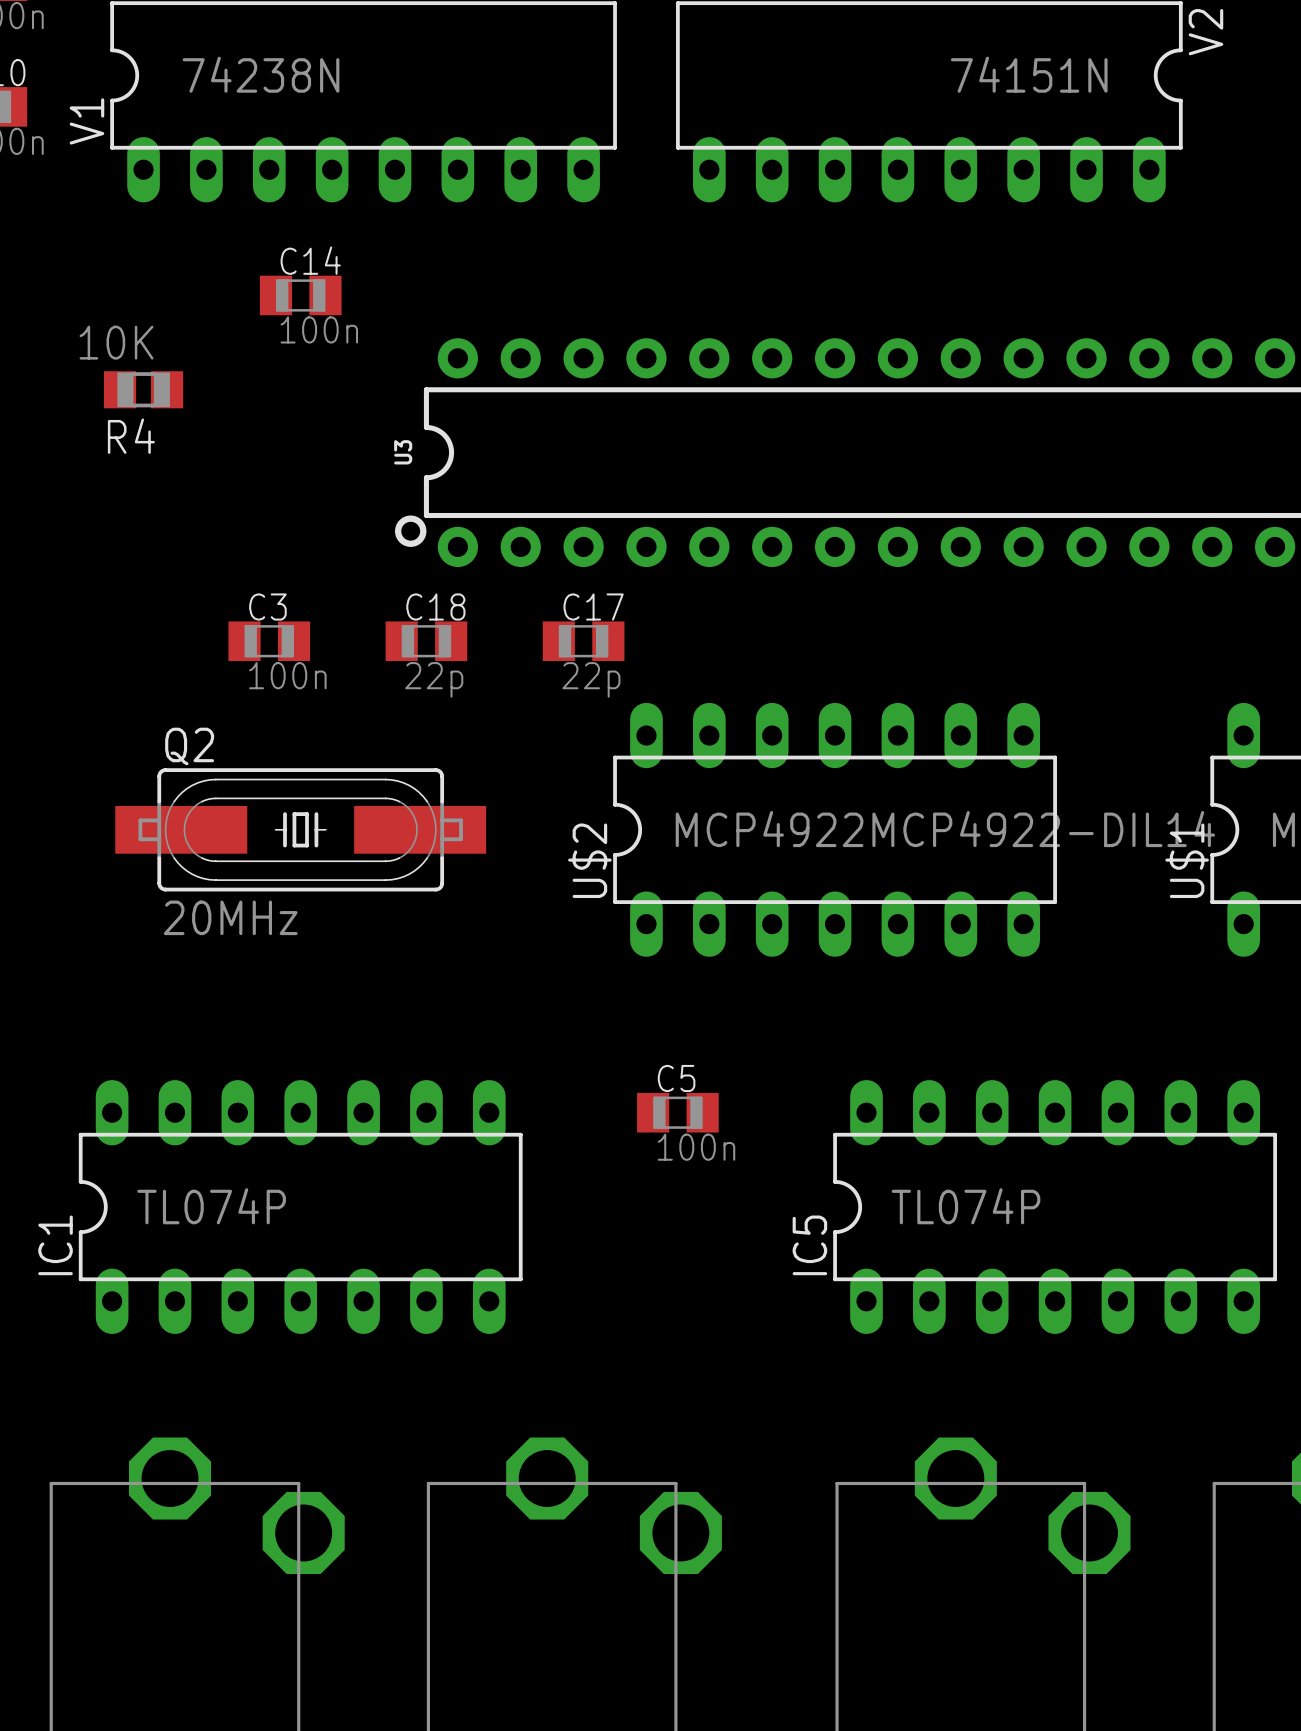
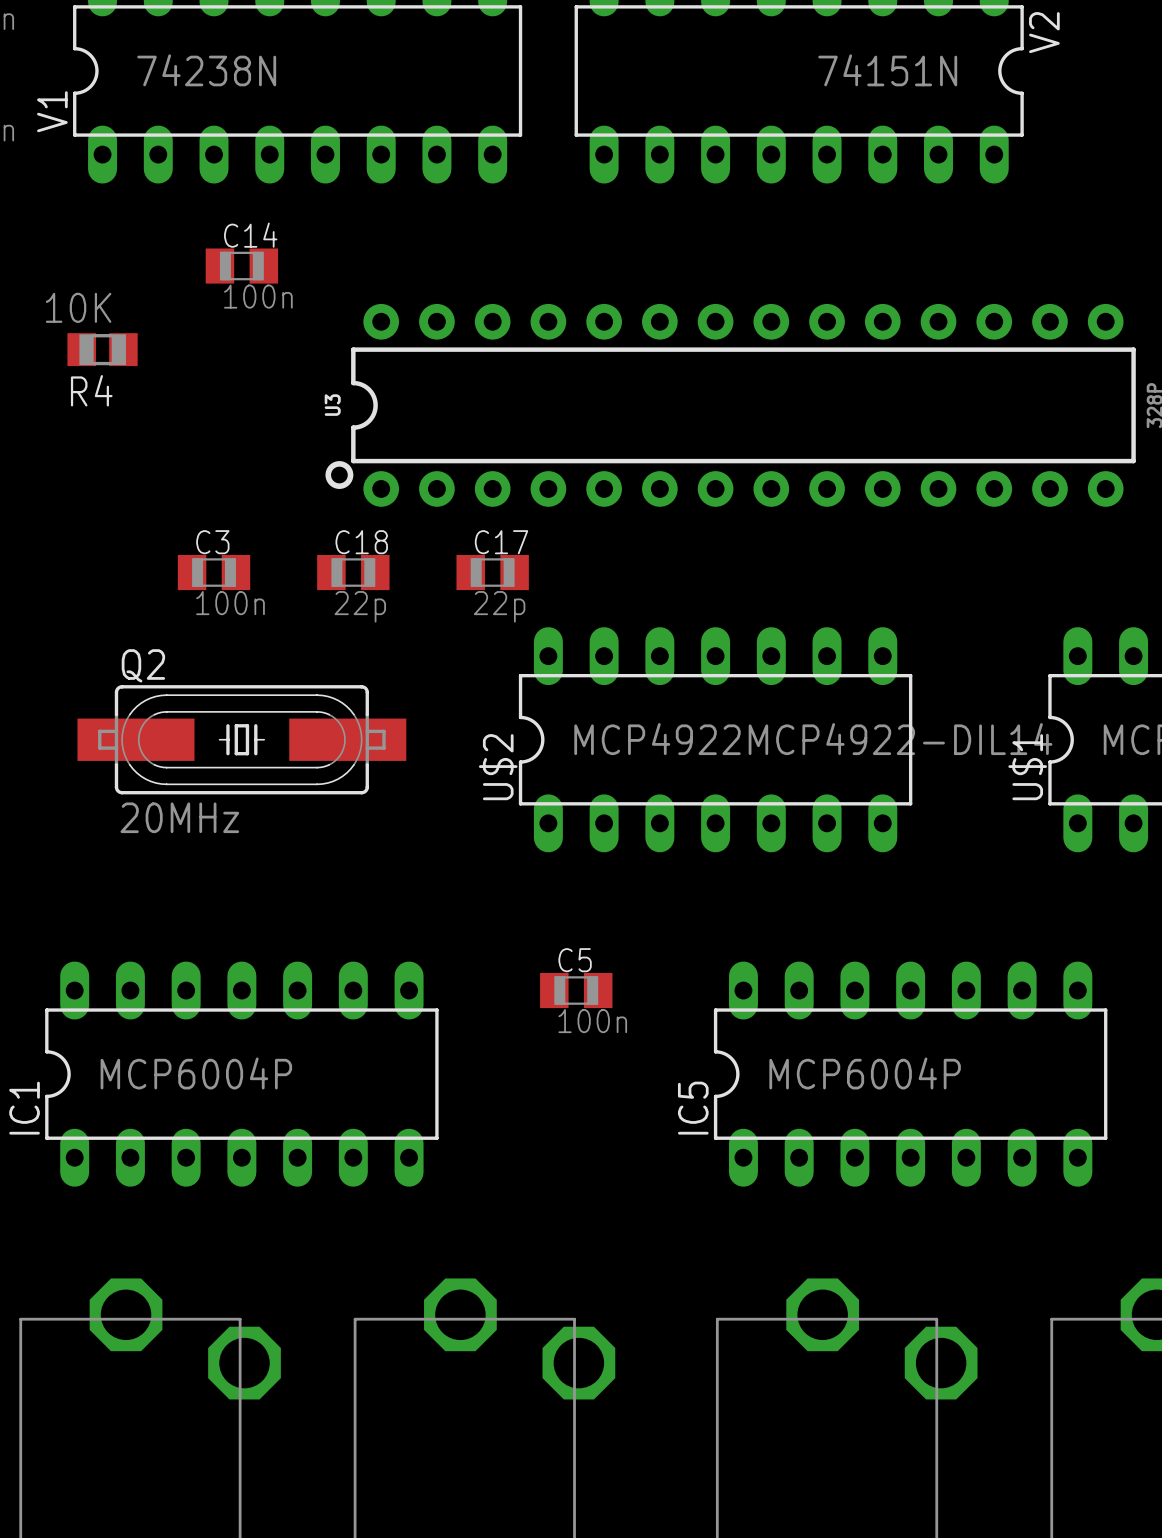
IC1 value: TL074P (211, 1206) -> MCP6004P (196, 1073)
IC5 value: TL074P (966, 1206) -> MCP6004P (865, 1073)

